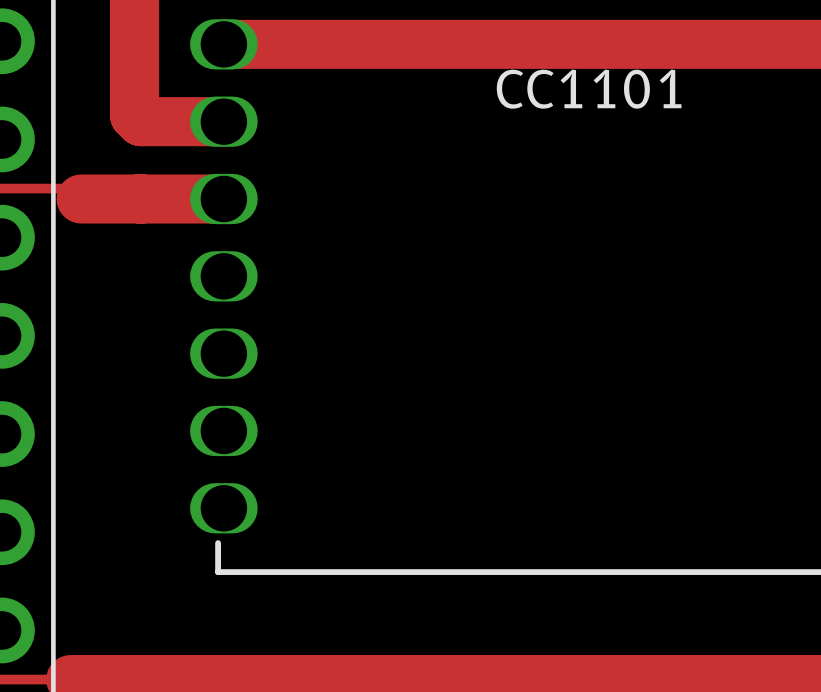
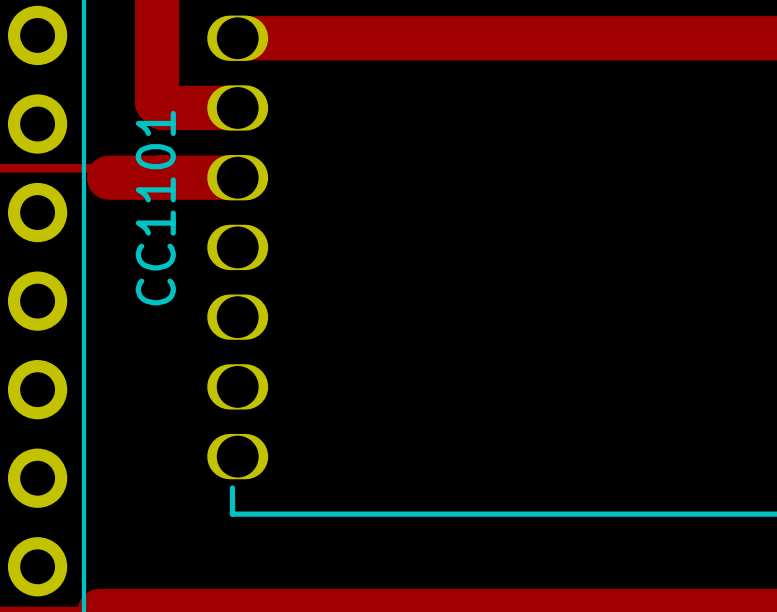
CC1101 name rotation: 0° (589, 89) -> 90° counterclockwise (155, 208)
CC1101 name position: CC1101 (589, 89) -> CC1101 (155, 208)

